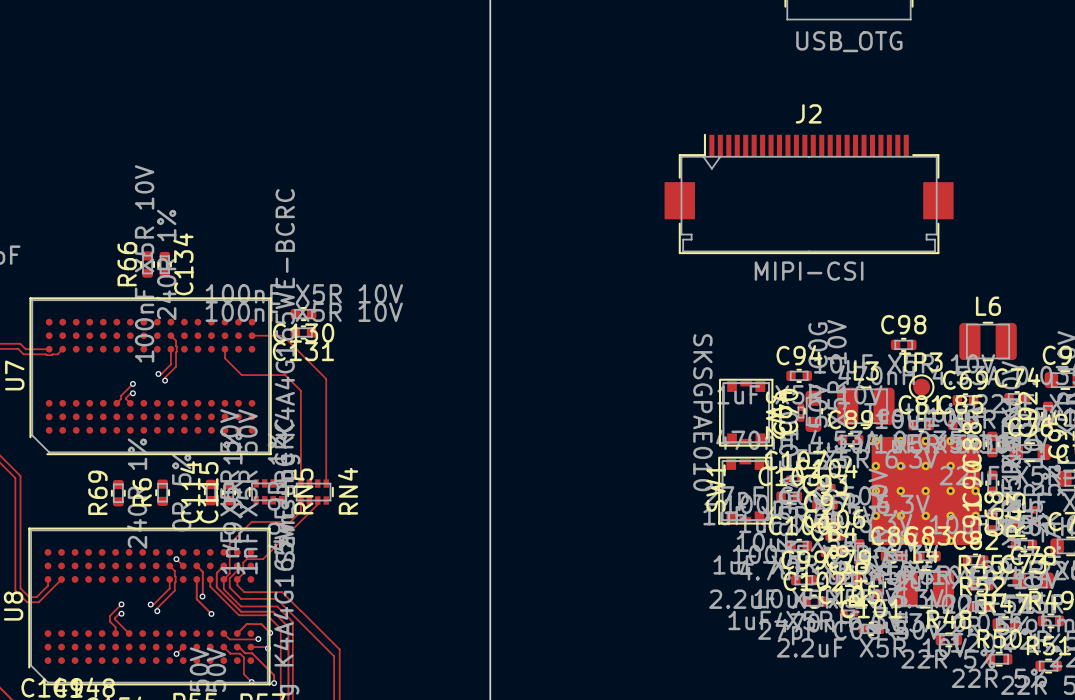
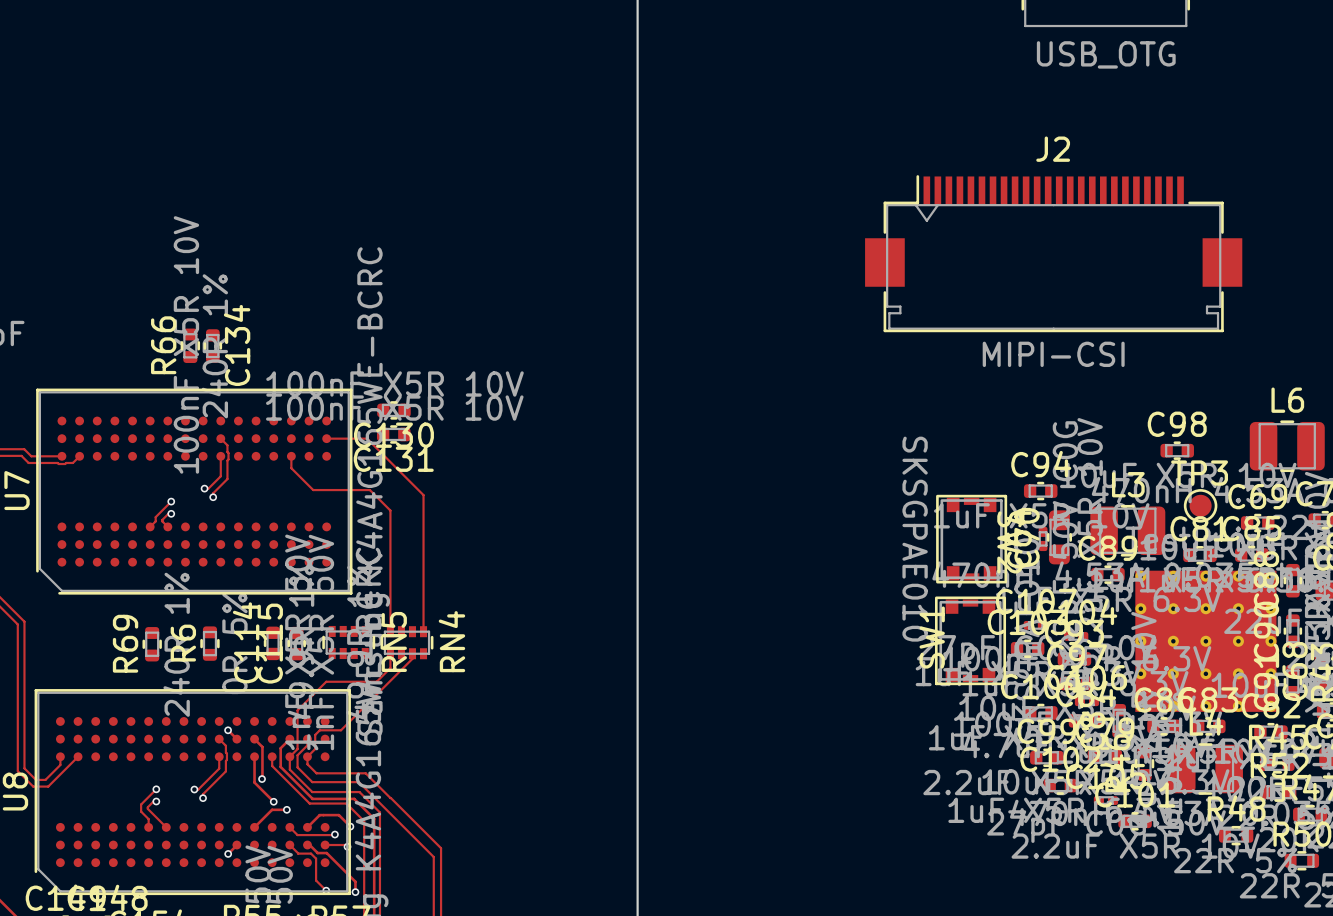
track: none -> (286, 809) (272, 809) (254, 827)
via: none -> (286, 809)

